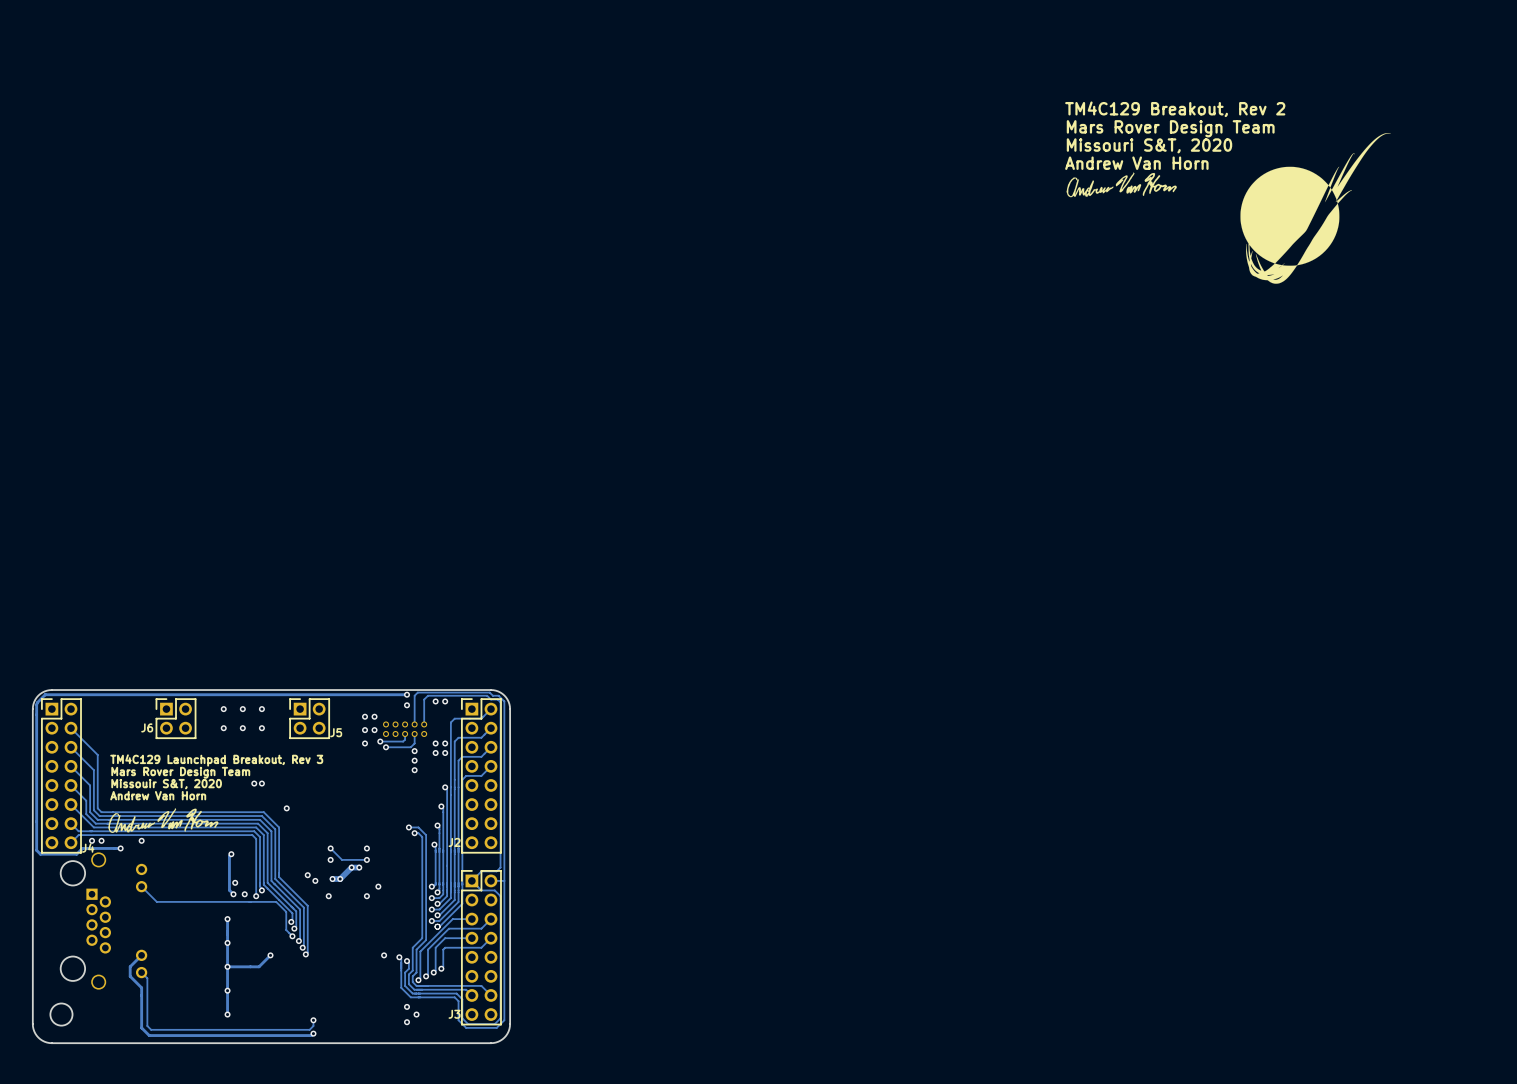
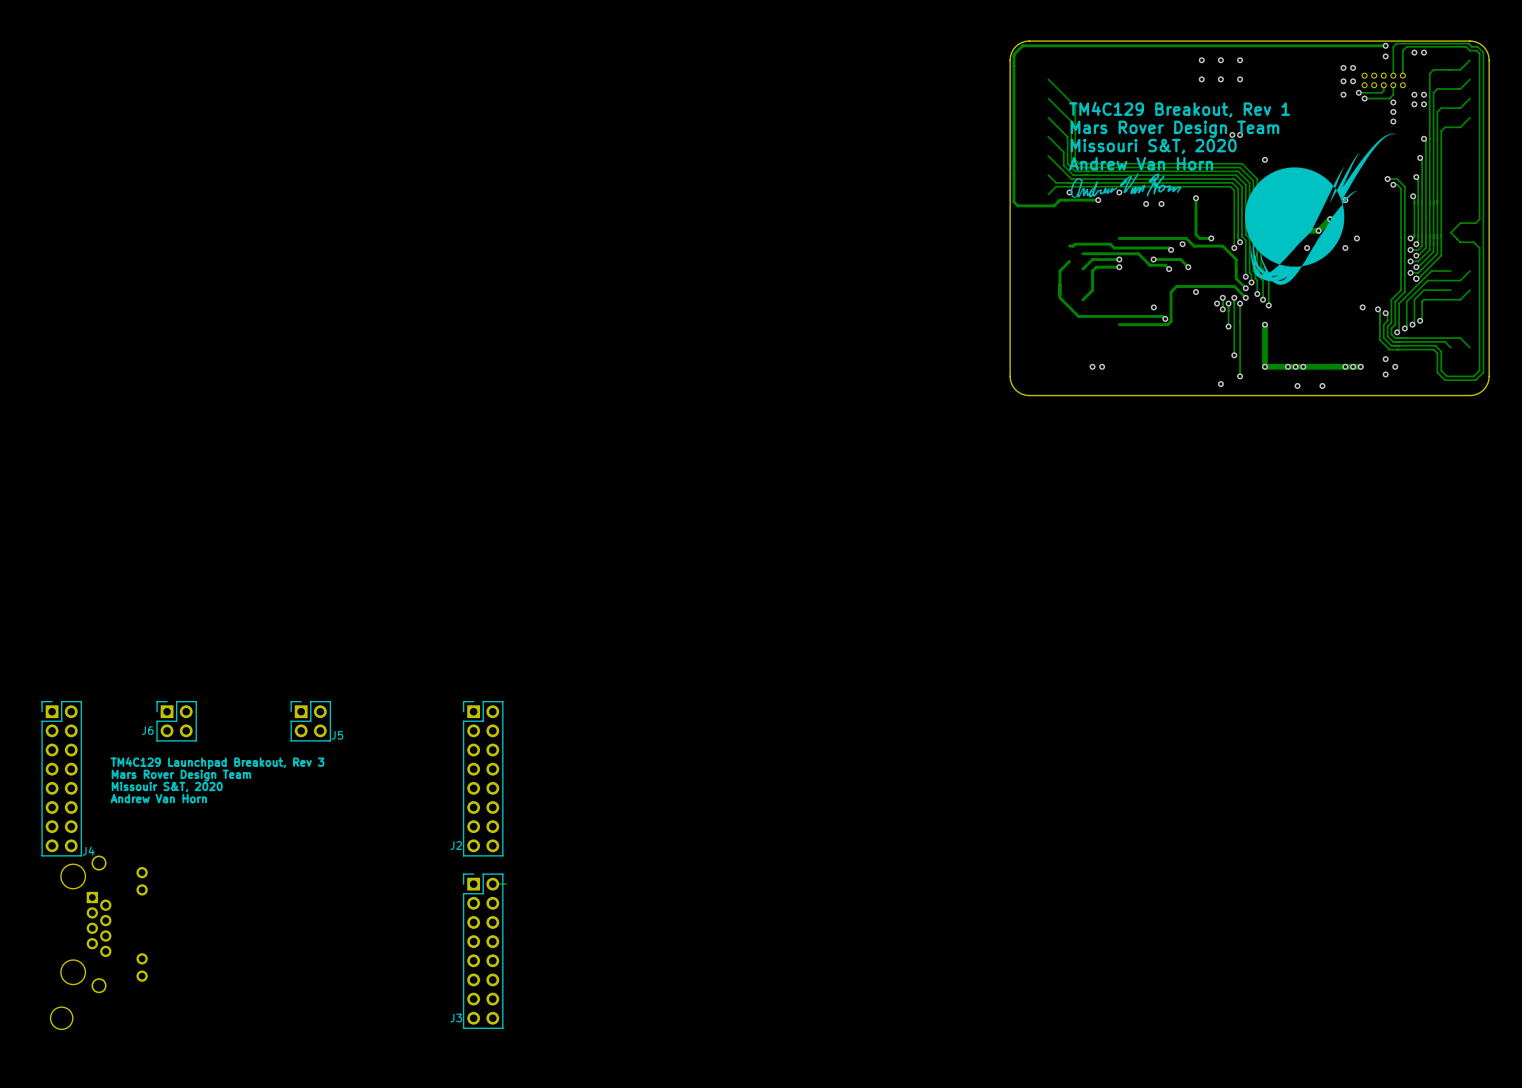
board edge: none -> (1469, 41) (1029, 41) (1017, 45) (1012, 50) (1010, 60) (1010, 376) (1014, 388) (1019, 392) (1029, 395) (1469, 395) (1481, 391) (1486, 385) (1489, 376) (1489, 60) (1483, 46) (1469, 41)
track: none -> (1022, 45) (1013, 55) (1013, 202) (1017, 205) (1054, 205) (1059, 200) (1098, 200)
track: none -> (1385, 45) (1022, 45)
via: none -> (1385, 45)
via: none -> (1414, 52)
via: none -> (1423, 52)
via: none -> (1385, 56)
via: none -> (1201, 60)
via: none -> (1220, 60)
via: none -> (1240, 60)
track: none -> (1469, 60) (1460, 69) (1433, 69) (1429, 73) (1429, 249) (1418, 261) (1410, 261)
via: none -> (1343, 67)
via: none -> (1353, 67)
track: none -> (1393, 75) (1393, 46) (1396, 43) (1468, 43) (1471, 46) (1477, 46) (1483, 52) (1483, 372) (1475, 380) (1445, 380) (1437, 372) (1437, 353) (1433, 349) (1389, 349) (1379, 339) (1379, 311) (1378, 309)
track: none -> (1402, 75) (1402, 50) (1406, 46) (1466, 46) (1469, 50) (1476, 50) (1479, 53) (1479, 219) (1475, 223) (1460, 223) (1450, 232) (1460, 242) (1473, 242) (1479, 248) (1479, 370) (1473, 376) (1446, 376) (1441, 370) (1441, 351) (1435, 345) (1391, 345) (1383, 338) (1383, 324) (1387, 320) (1385, 313)
track: none -> (1048, 79) (1075, 106) (1075, 159) (1079, 163) (1241, 163) (1257, 179) (1257, 228) (1261, 232) (1261, 267) (1263, 274) (1268, 280) (1268, 305)
via: none -> (1201, 79)
via: none -> (1220, 79)
via: none -> (1240, 79)
track: none -> (1469, 79) (1460, 88) (1437, 88) (1433, 92) (1433, 251) (1416, 267)
part: none -> (1383, 80)
via: none -> (1343, 81)
via: none -> (1353, 81)
track: none -> (1383, 85) (1381, 92) (1358, 92)
track: none -> (1393, 85) (1393, 94) (1389, 98) (1364, 98)
via: none -> (1358, 92)
via: none -> (1343, 94)
via: none -> (1414, 94)
via: none -> (1423, 94)
track: none -> (1048, 98) (1071, 121) (1071, 161) (1077, 167) (1240, 167) (1253, 180) (1253, 230) (1257, 234) (1257, 269) (1259, 276) (1263, 280) (1263, 299)
via: none -> (1364, 98)
track: none -> (1469, 98) (1460, 108) (1441, 108) (1437, 111) (1437, 253) (1418, 272) (1410, 272)
via: none -> (1393, 102)
via: none -> (1414, 104)
via: none -> (1423, 104)
text: TM4C129 Breakout, Rev 2 (1175, 109) -> TM4C129 Breakout, Rev 1 (1179, 109)
via: none -> (1393, 111)
track: none -> (1048, 117) (1067, 136) (1067, 163) (1075, 171) (1238, 171) (1249, 182) (1249, 232) (1253, 236) (1253, 271) (1257, 280) (1257, 294)
track: none -> (1469, 117) (1460, 127) (1445, 127) (1441, 131) (1441, 255) (1416, 278)
via: none -> (1393, 121)
via: none -> (1232, 134)
via: none -> (1240, 134)
track: none -> (1048, 136) (1063, 152) (1063, 165) (1073, 175) (1236, 175) (1245, 184) (1245, 234) (1249, 238) (1251, 282)
track: none -> (1423, 138) (1425, 140) (1425, 248) (1416, 255)
via: none -> (1423, 138)
track: none -> (1048, 156) (1071, 179) (1234, 179) (1241, 186) (1241, 236) (1245, 240) (1245, 276)
track: none -> (1420, 157) (1422, 159) (1422, 246) (1418, 249) (1410, 249)
via: none -> (1420, 157)
via: none -> (1264, 159)
track: none -> (1048, 175) (1056, 182) (1232, 182) (1238, 188) (1238, 238) (1240, 242)
track: none -> (1416, 177) (1418, 179) (1418, 242) (1416, 244)
via: none -> (1416, 177)
track: none -> (1387, 179) (1397, 179) (1404, 186) (1404, 292) (1395, 301) (1395, 324) (1391, 328) (1391, 334) (1395, 338) (1460, 338) (1469, 347)
via: none -> (1387, 179)
track: none -> (1393, 184) (1397, 184) (1401, 188) (1401, 290) (1391, 299) (1391, 322) (1387, 326) (1387, 336) (1393, 341) (1445, 341) (1450, 347)
via: none -> (1393, 184)
via: none -> (1069, 192)
via: none -> (1119, 192)
track: none -> (1048, 194) (1056, 186) (1230, 186) (1234, 190) (1234, 248)
track: none -> (1413, 196) (1414, 236) (1410, 238)
via: none -> (1413, 196)
track: none -> (1195, 198) (1195, 234) (1199, 238) (1211, 238)
via: none -> (1195, 198)
via: none -> (1098, 200)
via: none -> (1345, 200)
via: none -> (1146, 203)
via: none -> (1161, 203)
via: none -> (1330, 219)
track: none -> (1337, 219) (1330, 219) (1318, 230) (1310, 230)
via: none -> (1318, 230)
track: none -> (1119, 238) (1186, 238) (1194, 246) (1222, 246) (1236, 259) (1236, 278) (1245, 288)
via: none -> (1211, 238)
via: none -> (1356, 238)
via: none -> (1410, 238)
via: none -> (1240, 242)
via: none -> (1182, 244)
via: none -> (1416, 244)
track: none -> (1069, 246) (1075, 244) (1110, 244) (1114, 248) (1169, 248) (1171, 249)
via: none -> (1234, 248)
via: none -> (1307, 248)
via: none -> (1345, 248)
via: none -> (1171, 249)
via: none -> (1410, 249)
track: none -> (1082, 253) (1138, 253) (1150, 265) (1165, 265) (1169, 269)
via: none -> (1416, 255)
track: none -> (1119, 259) (1092, 259) (1082, 269)
via: none -> (1119, 259)
track: none -> (1153, 259) (1180, 259) (1188, 267)
via: none -> (1153, 259)
track: none -> (1069, 261) (1059, 271) (1059, 297) (1078, 316) (1162, 316) (1165, 318)
via: none -> (1410, 261)
track: none -> (1119, 267) (1096, 267) (1092, 271) (1092, 290) (1082, 299)
via: none -> (1119, 267)
via: none -> (1188, 267)
via: none -> (1416, 267)
via: none -> (1169, 269)
track: none -> (1450, 271) (1431, 271) (1399, 303) (1399, 330) (1397, 332)
track: none -> (1469, 271) (1460, 280) (1427, 280) (1406, 301) (1406, 326) (1404, 328)
via: none -> (1410, 272)
via: none -> (1245, 276)
via: none -> (1416, 278)
via: none -> (1251, 282)
via: none -> (1245, 288)
track: none -> (1450, 290) (1423, 290) (1414, 299) (1414, 322) (1412, 324)
track: none -> (1469, 290) (1460, 299) (1423, 299) (1422, 301) (1422, 318) (1420, 320)
via: none -> (1195, 292)
via: none -> (1257, 294)
track: none -> (1222, 297) (1222, 309)
via: none -> (1222, 297)
track: none -> (1234, 297) (1234, 355)
via: none -> (1234, 297)
track: none -> (1245, 297) (1234, 286) (1176, 286) (1171, 292) (1171, 321) (1167, 324) (1119, 324)
via: none -> (1245, 297)
via: none -> (1263, 299)
via: none -> (1217, 303)
track: none -> (1228, 303) (1228, 326)
via: none -> (1228, 303)
track: none -> (1240, 303) (1240, 376)
via: none -> (1240, 303)
via: none -> (1268, 305)
via: none -> (1153, 307)
via: none -> (1362, 307)
via: none -> (1222, 309)
via: none -> (1378, 309)
via: none -> (1385, 313)
via: none -> (1165, 318)
via: none -> (1420, 320)
track: none -> (1264, 324) (1264, 366) (1360, 366)
via: none -> (1264, 324)
via: none -> (1412, 324)
via: none -> (1228, 326)
via: none -> (1404, 328)
via: none -> (1397, 332)
via: none -> (1234, 355)
via: none -> (1385, 359)
via: none -> (1092, 366)
via: none -> (1102, 366)
via: none -> (1264, 366)
via: none -> (1287, 366)
via: none -> (1295, 366)
via: none -> (1303, 366)
via: none -> (1345, 366)
via: none -> (1353, 366)
via: none -> (1360, 366)
via: none -> (1395, 366)
via: none -> (1385, 374)
via: none -> (1240, 376)
via: none -> (1220, 384)
via: none -> (1297, 385)
via: none -> (1322, 385)
board edge: (491, 690) (51, 690) (40, 693) (35, 699) (32, 709) (32, 1024) (36, 1035) (42, 1040) (51, 1043) (491, 1043) (502, 1039) (508, 1031) (510, 1024) (510, 709) (504, 695) (491, 690) -> none
track: (45, 694) (36, 704) (36, 850) (40, 854) (76, 854) (82, 848) (120, 848) -> none
track: (407, 694) (45, 694) -> none
via: (407, 694) -> none
via: (435, 701) -> none
via: (445, 701) -> none
via: (407, 705) -> none
via: (223, 709) -> none
via: (242, 709) -> none
via: (261, 709) -> none
track: (491, 709) (481, 718) (454, 718) (450, 722) (450, 898) (439, 909) (431, 909) -> none
via: (365, 716) -> none
via: (374, 716) -> none
track: (414, 724) (414, 695) (417, 692) (489, 692) (492, 695) (498, 695) (504, 701) (504, 1020) (496, 1027) (466, 1027) (458, 1020) (458, 1001) (454, 997) (410, 997) (401, 987) (401, 959) (399, 957) -> none
track: (424, 724) (424, 699) (428, 695) (487, 695) (491, 699) (497, 699) (500, 702) (500, 867) (496, 871) (481, 871) (471, 880) (481, 890) (494, 890) (500, 896) (500, 1018) (494, 1024) (468, 1024) (462, 1018) (462, 999) (456, 993) (412, 993) (405, 985) (405, 972) (408, 968) (407, 961) -> none
track: (71, 728) (97, 754) (97, 808) (101, 812) (263, 812) (279, 827) (279, 877) (307, 905) (307, 952) (305, 954) -> none
via: (223, 728) -> none
via: (242, 728) -> none
via: (261, 728) -> none
track: (491, 728) (481, 737) (458, 737) (454, 741) (454, 900) (437, 915) -> none
part: (405, 729) -> none
via: (365, 730) -> none
via: (374, 730) -> none
track: (405, 733) (403, 741) (380, 741) -> none
track: (414, 733) (414, 743) (410, 747) (386, 747) -> none
via: (380, 741) -> none
via: (365, 743) -> none
via: (435, 743) -> none
via: (445, 743) -> none
track: (71, 747) (93, 770) (93, 810) (99, 816) (261, 816) (275, 829) (275, 879) (303, 907) (302, 947) -> none
via: (386, 747) -> none
track: (491, 747) (481, 756) (462, 756) (458, 760) (458, 901) (439, 921) (431, 921) -> none
via: (414, 751) -> none
via: (435, 753) -> none
via: (445, 753) -> none
via: (414, 760) -> none
track: (71, 766) (90, 785) (90, 812) (97, 819) (260, 819) (271, 831) (271, 880) (300, 909) (298, 941) -> none
track: (491, 766) (481, 775) (466, 775) (462, 779) (462, 903) (437, 926) -> none
via: (414, 770) -> none
via: (254, 783) -> none
via: (261, 783) -> none
track: (71, 785) (86, 800) (86, 814) (95, 823) (258, 823) (267, 833) (267, 882) (296, 911) (296, 926) (294, 928) -> none
track: (445, 787) (447, 789) (447, 896) (437, 903) -> none
via: (445, 787) -> none
track: (71, 804) (93, 827) (256, 827) (263, 835) (263, 884) (292, 913) (291, 921) -> none
track: (441, 806) (443, 808) (443, 894) (439, 898) (431, 898) -> none
via: (441, 806) -> none
drawing: [108, 808, 219, 833] -> none
via: (286, 808) -> none
track: (71, 823) (78, 831) (254, 831) (260, 837) (260, 886) (261, 890) -> none
track: (437, 825) (439, 827) (439, 890) (437, 892) -> none
via: (437, 825) -> none
track: (408, 827) (418, 827) (426, 835) (426, 940) (416, 949) (416, 972) (412, 976) (412, 982) (416, 985) (481, 985) (491, 995) -> none
via: (408, 827) -> none
track: (414, 833) (418, 833) (422, 837) (422, 938) (412, 947) (412, 970) (408, 974) (408, 984) (414, 989) (466, 989) (471, 995) -> none
via: (414, 833) -> none
via: (92, 840) -> none
via: (101, 840) -> none
via: (141, 840) -> none
track: (71, 842) (78, 835) (252, 835) (256, 838) (256, 896) -> none
track: (434, 844) (435, 884) (431, 886) -> none
via: (434, 844) -> none
via: (120, 848) -> none
track: (330, 848) (342, 859) (366, 859) -> none
via: (330, 848) -> none
via: (366, 848) -> none
track: (231, 854) (229, 856) (229, 890) (233, 894) -> none
via: (231, 854) -> none
via: (330, 859) -> none
via: (366, 859) -> none
via: (351, 867) -> none
track: (359, 867) (351, 867) (340, 879) (332, 879) -> none
via: (359, 867) -> none
via: (307, 875) -> none
via: (332, 879) -> none
via: (340, 879) -> none
via: (315, 880) -> none
via: (235, 882) -> none
track: (141, 886) (156, 901) (276, 901) (286, 911) (286, 930) (292, 936) -> none
via: (378, 886) -> none
via: (431, 886) -> none
via: (261, 890) -> none
via: (437, 892) -> none
via: (233, 894) -> none
via: (244, 894) -> none
via: (256, 896) -> none
via: (328, 896) -> none
via: (366, 896) -> none
via: (431, 898) -> none
via: (437, 903) -> none
via: (431, 909) -> none
via: (437, 915) -> none
track: (227, 919) (227, 1014) -> none
via: (227, 919) -> none
track: (471, 919) (452, 919) (420, 951) (420, 978) (418, 980) -> none
track: (491, 919) (481, 928) (449, 928) (428, 949) (428, 974) (426, 976) -> none
via: (291, 921) -> none
via: (431, 921) -> none
via: (437, 926) -> none
via: (294, 928) -> none
via: (292, 936) -> none
track: (471, 938) (445, 938) (435, 947) (435, 970) (433, 972) -> none
track: (491, 938) (481, 947) (445, 947) (443, 949) (443, 966) (441, 968) -> none
via: (298, 941) -> none
via: (227, 942) -> none
via: (302, 947) -> none
via: (305, 954) -> none
track: (141, 955) (130, 966) (130, 976) (141, 987) (141, 1027) (149, 1035) (311, 1035) (313, 1033) -> none
track: (270, 955) (259, 966) (227, 966) -> none
via: (270, 955) -> none
via: (384, 955) -> none
via: (399, 957) -> none
via: (407, 961) -> none
via: (227, 966) -> none
via: (441, 968) -> none
via: (433, 972) -> none
track: (141, 974) (141, 972) (147, 978) (147, 1026) (151, 1029) (309, 1029) (313, 1026) (313, 1020) -> none
via: (426, 976) -> none
via: (418, 980) -> none
via: (227, 990) -> none
via: (407, 1006) -> none
via: (227, 1014) -> none
via: (416, 1014) -> none
via: (313, 1020) -> none
via: (407, 1022) -> none
via: (313, 1033) -> none

